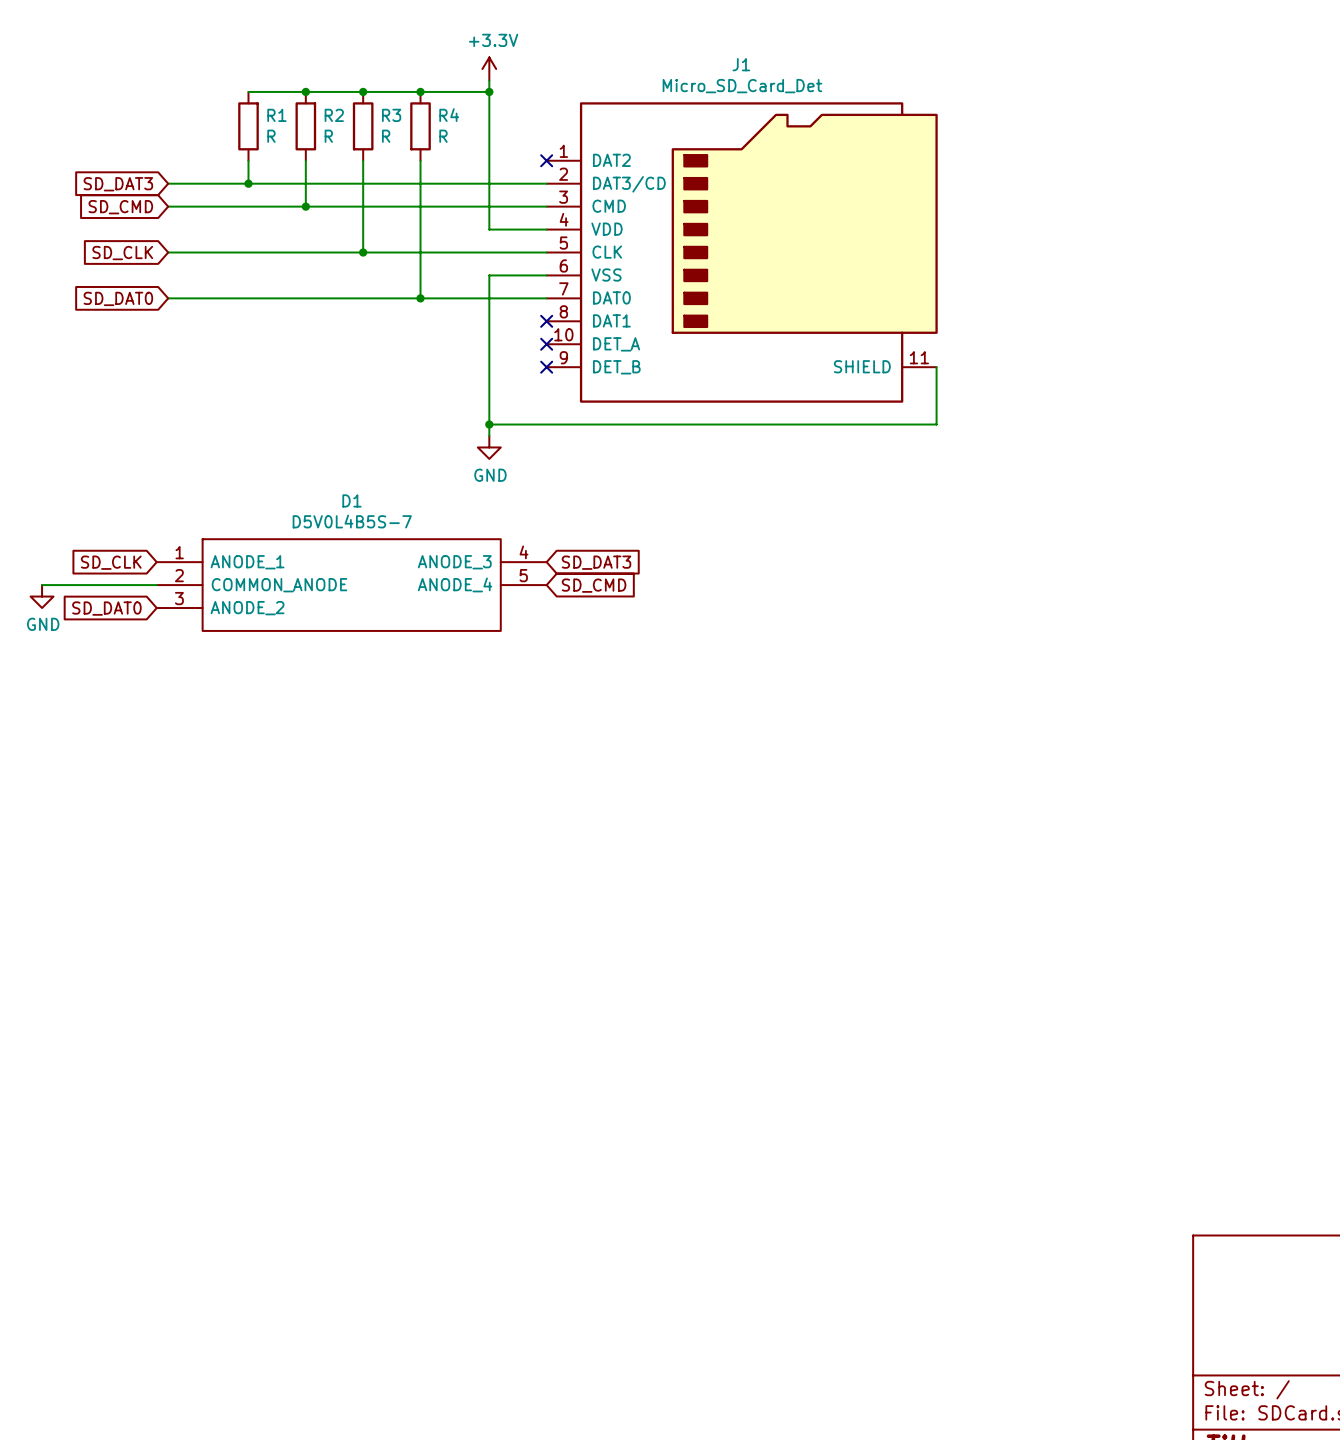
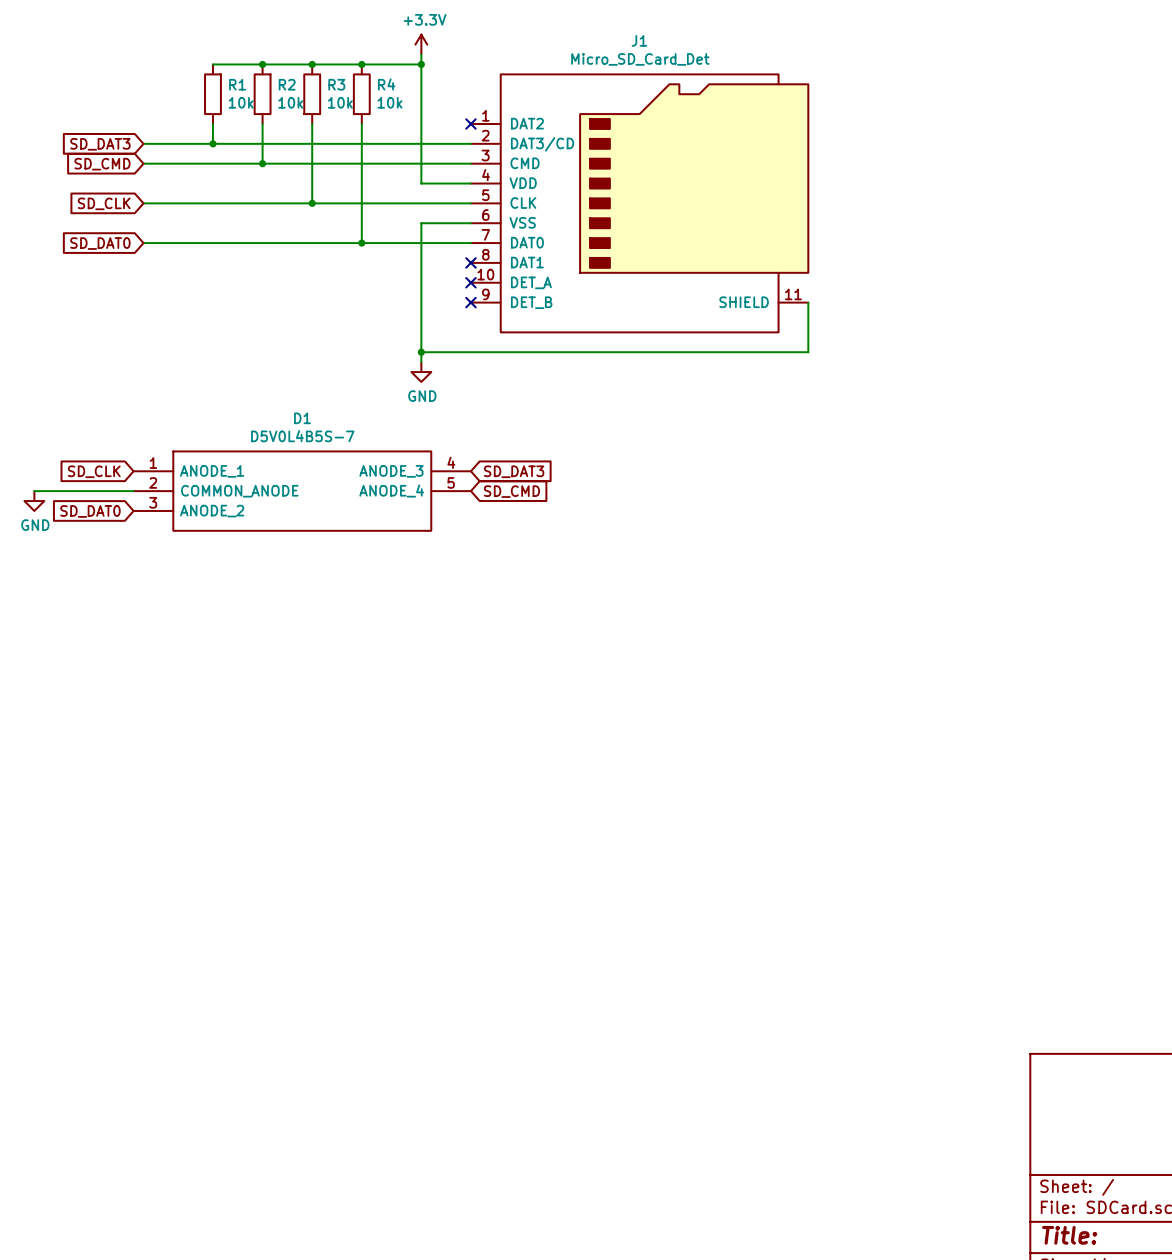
R1 value: R (271, 136) -> 10k (241, 102)
R2 value: R (328, 136) -> 10k (290, 102)
R3 value: R (386, 136) -> 10k (340, 102)
R4 value: R (443, 136) -> 10k (389, 102)

